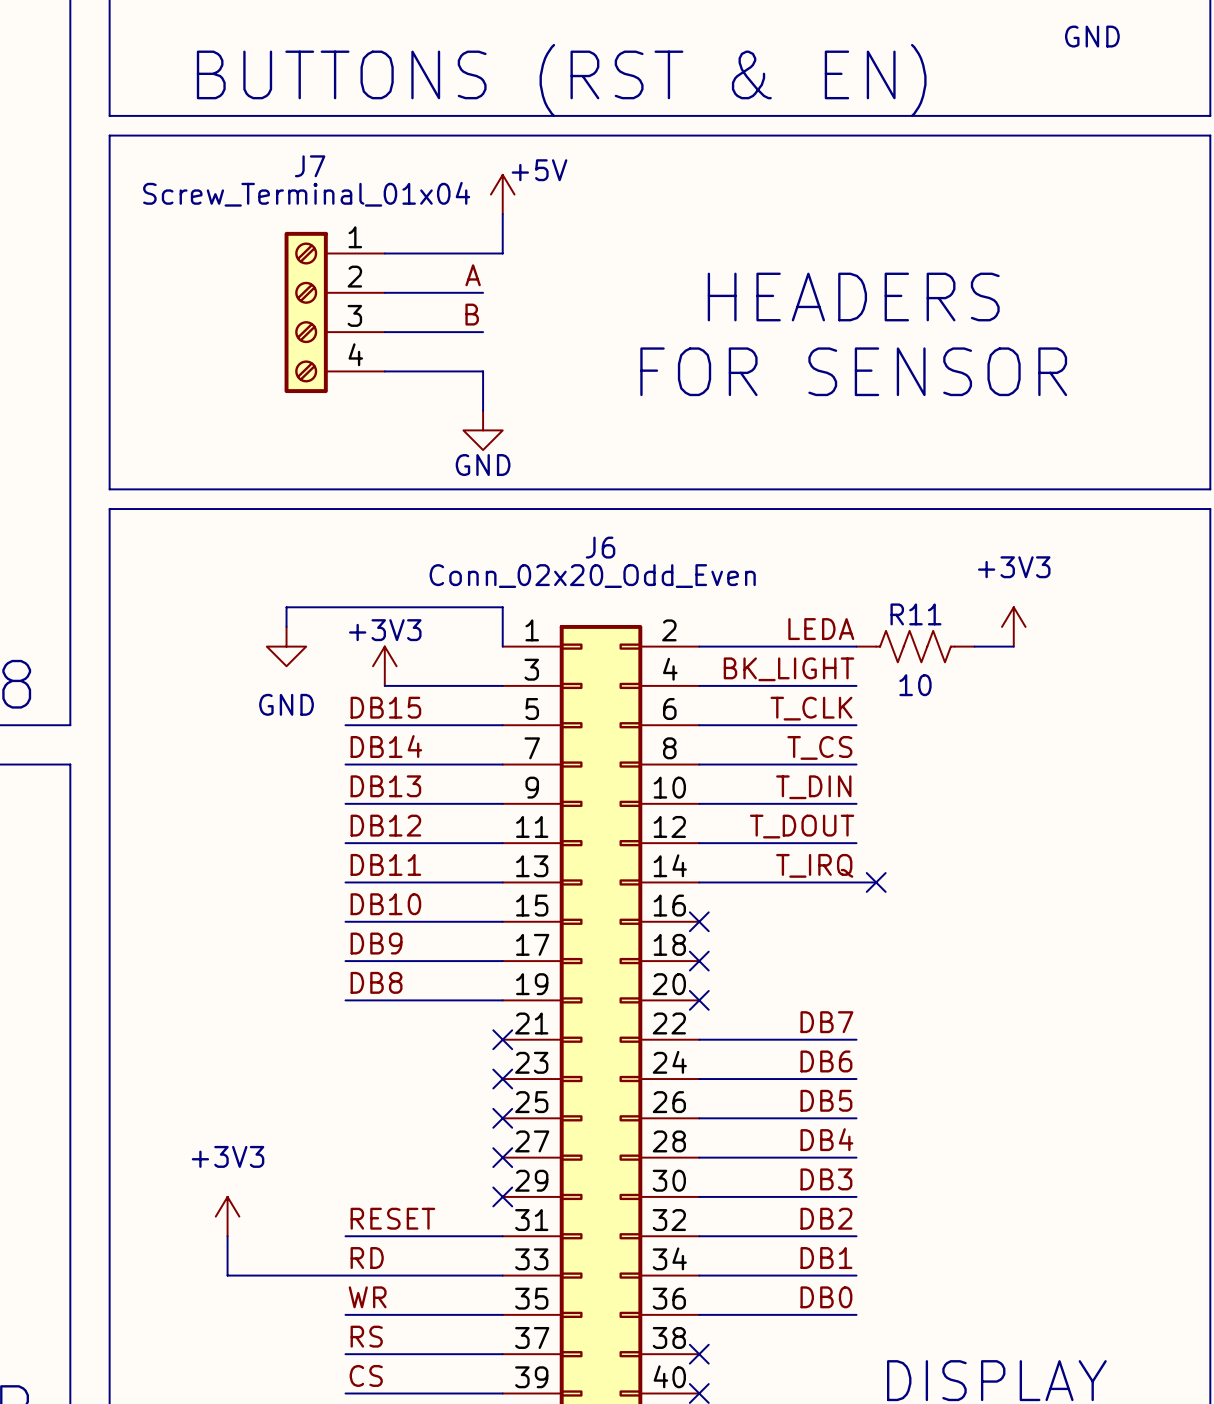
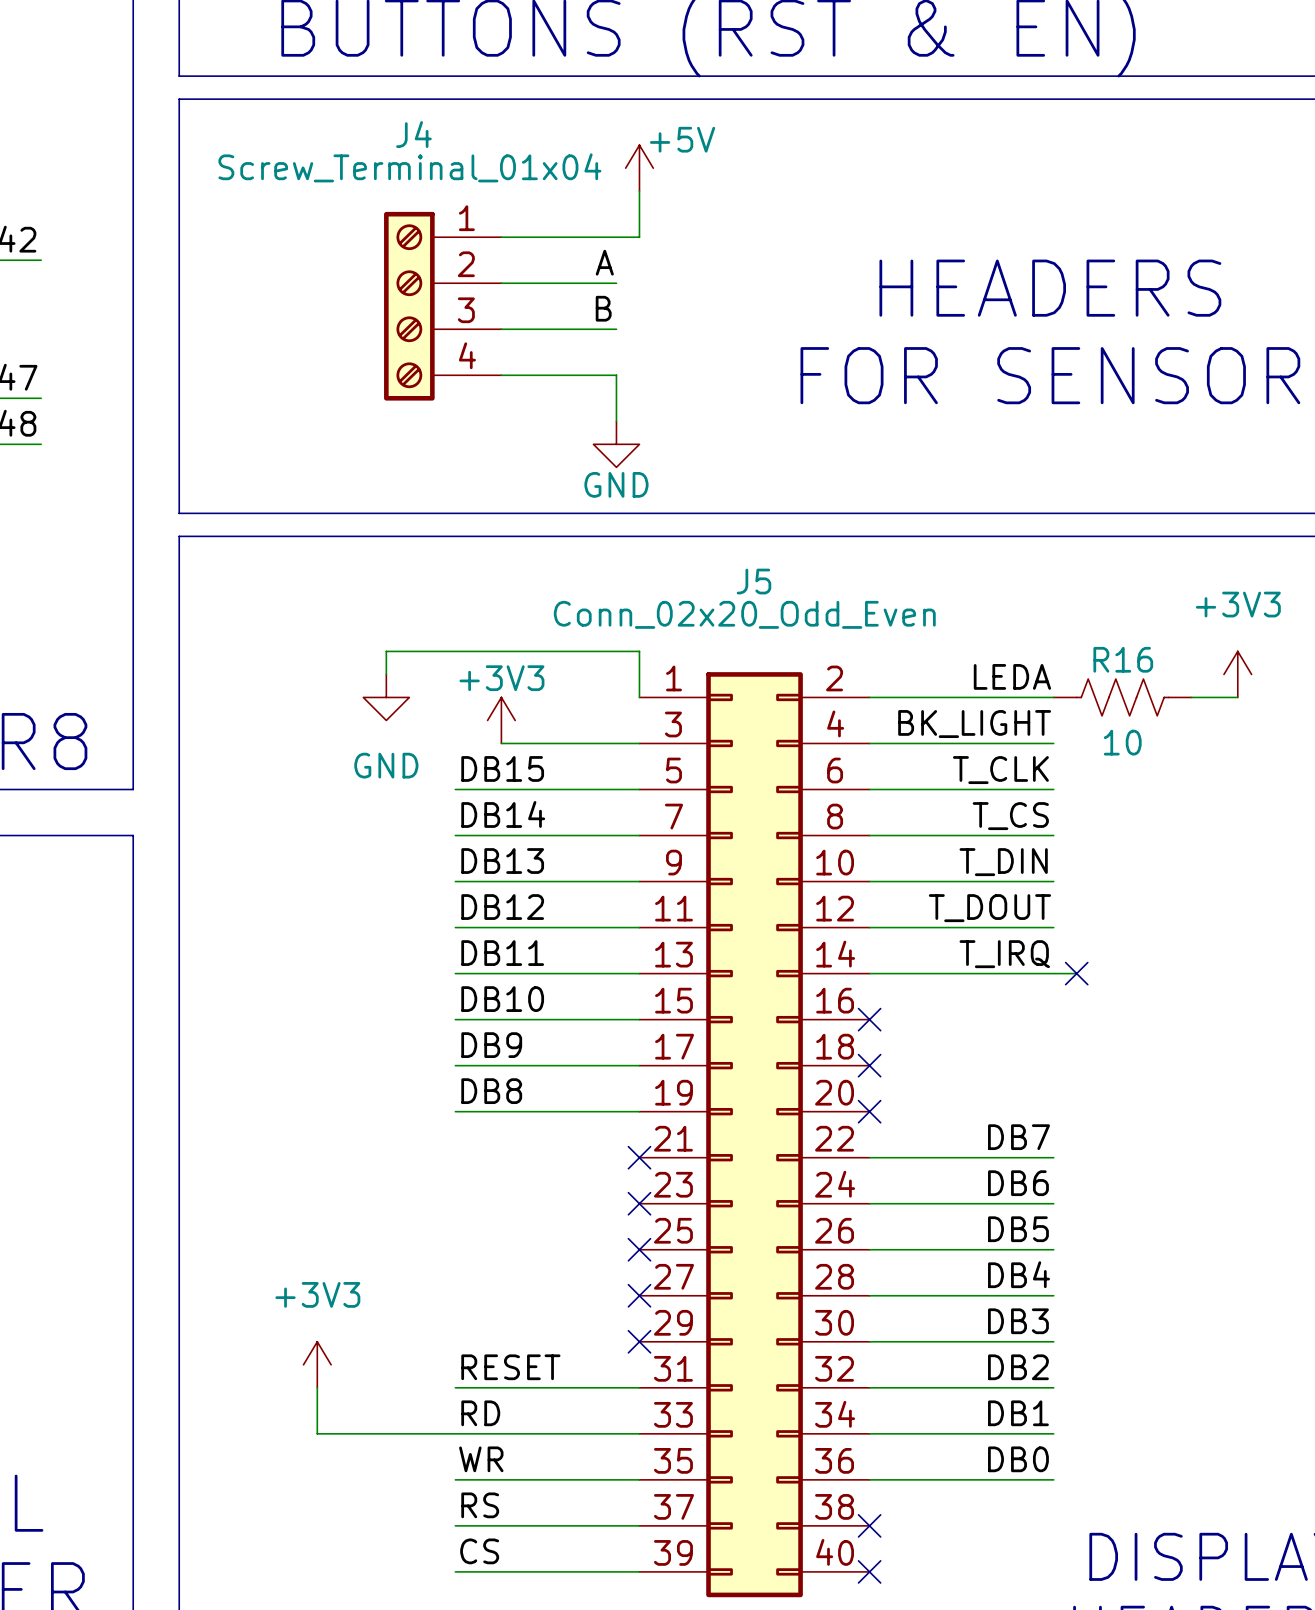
J7 name: J7 (310, 166) -> J4 (413, 134)
J6 name: J6 (600, 547) -> J5 (753, 581)
R11 name: R11 (915, 614) -> R16 (1123, 659)

